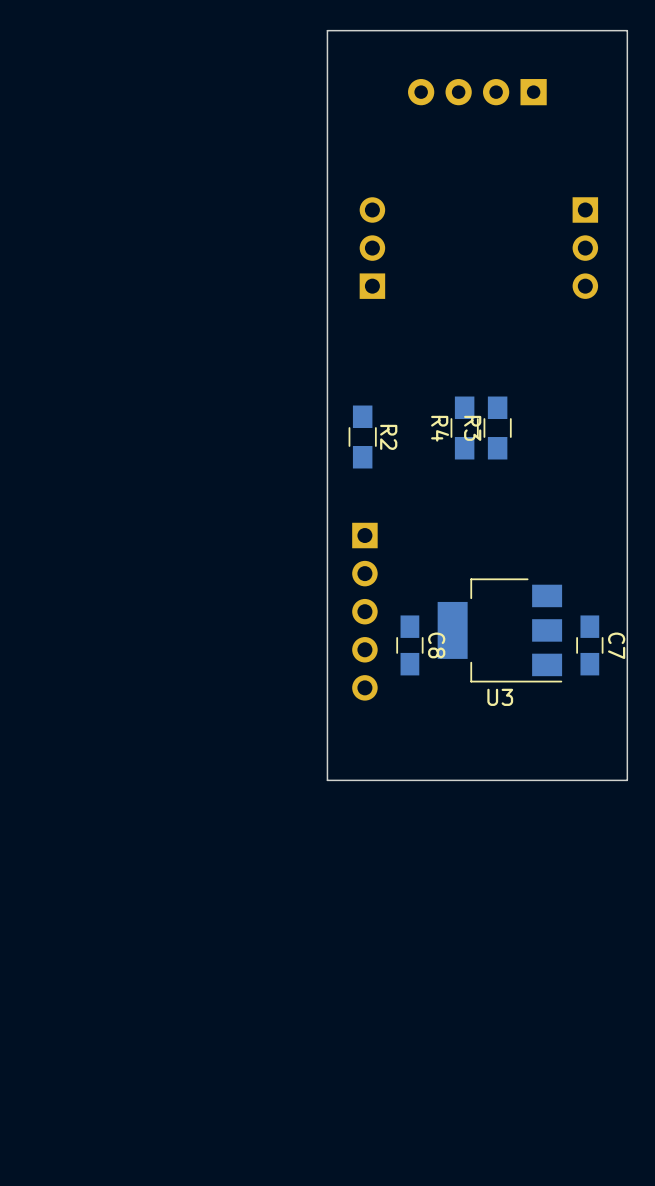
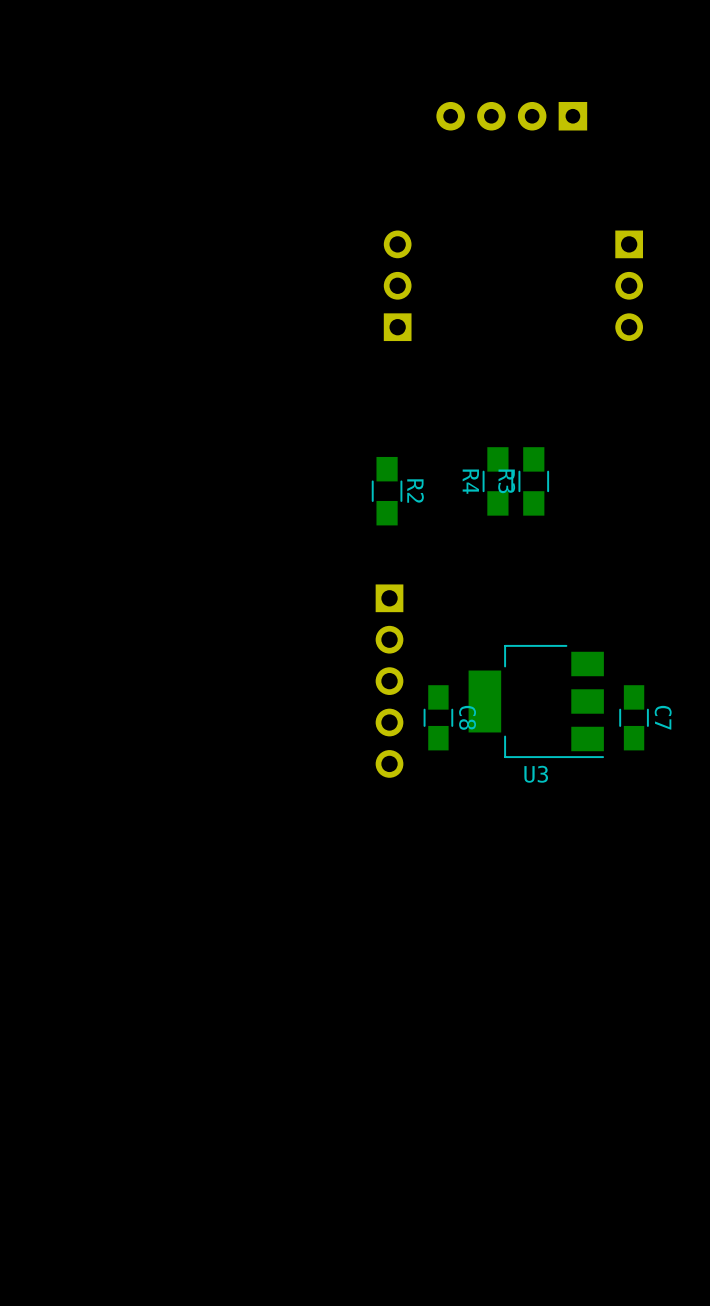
board edge: (627, 30) (627, 780) (327, 780) (327, 30) (627, 30) -> none

